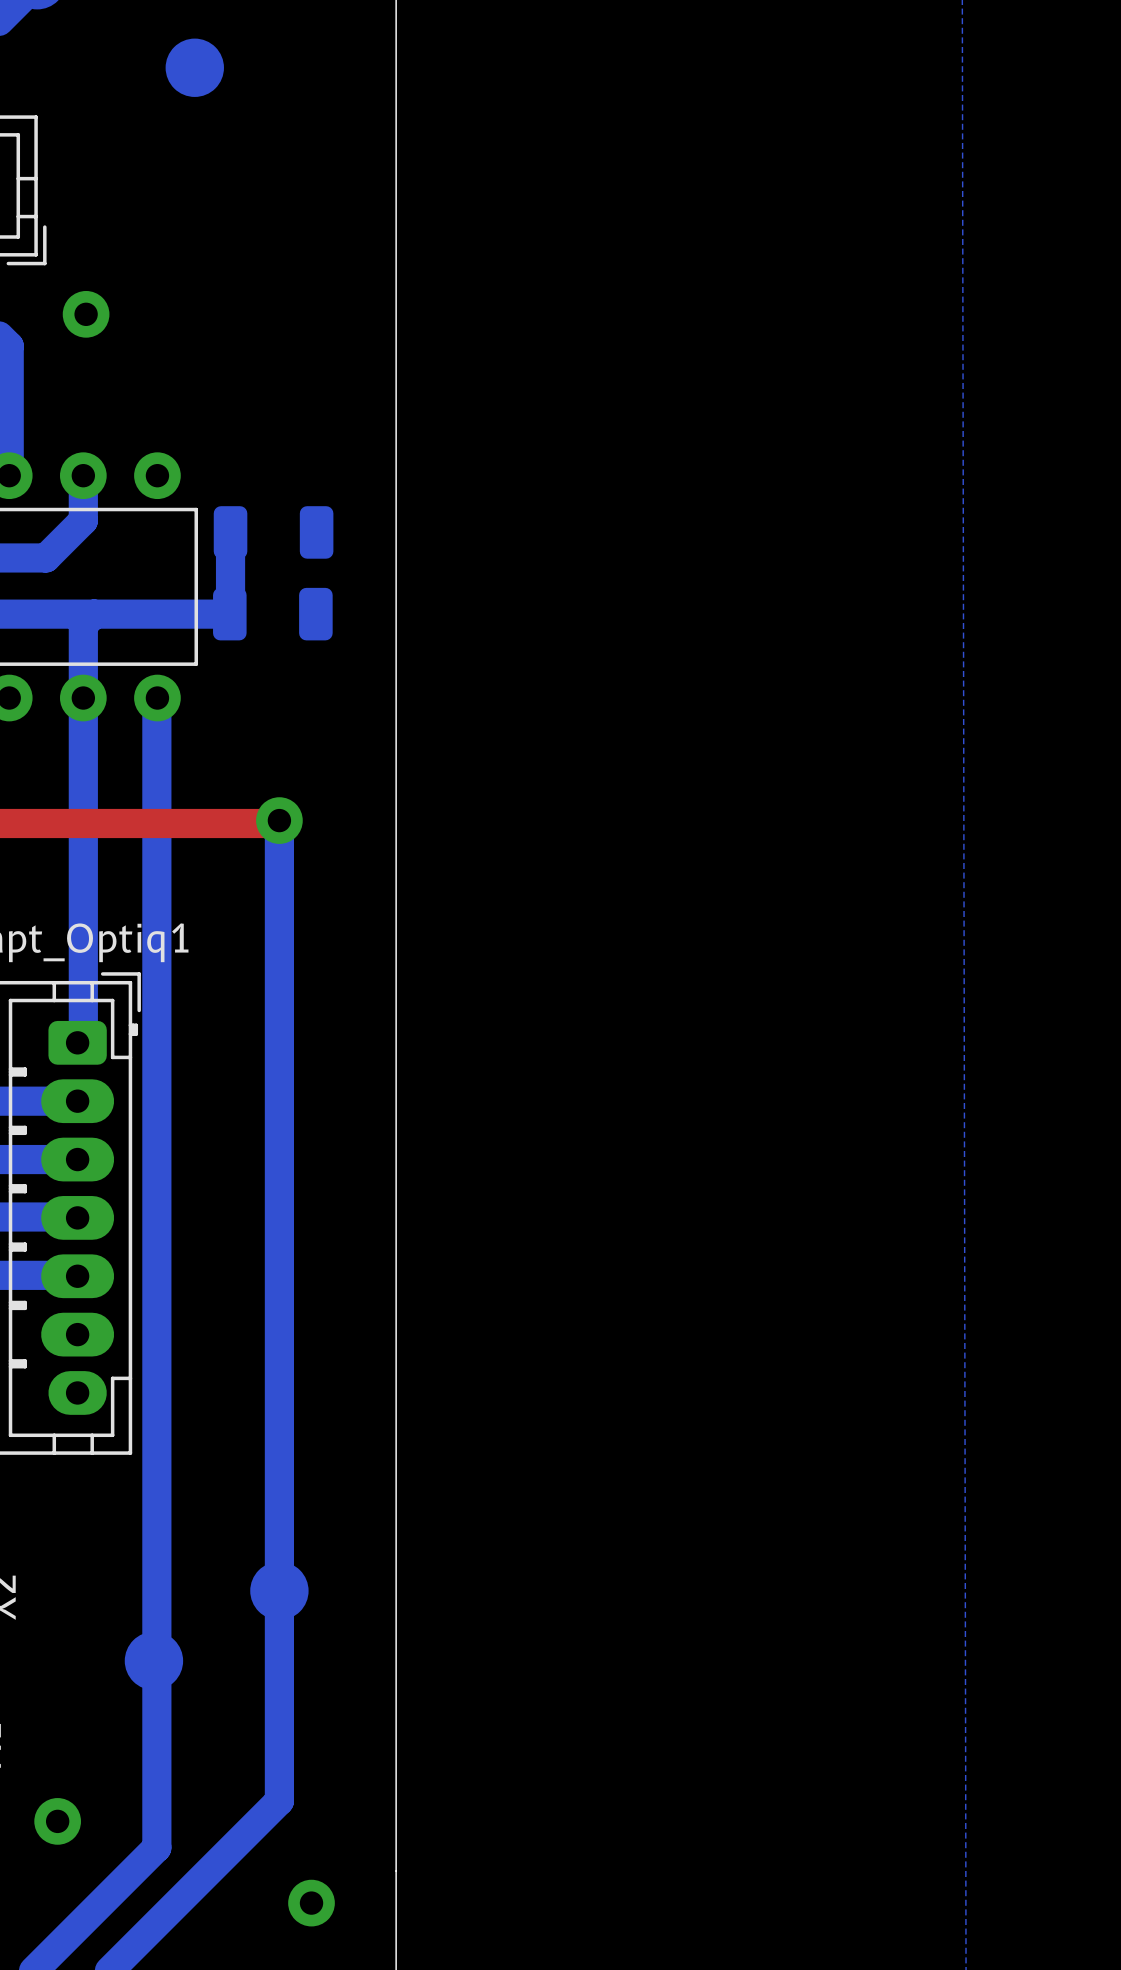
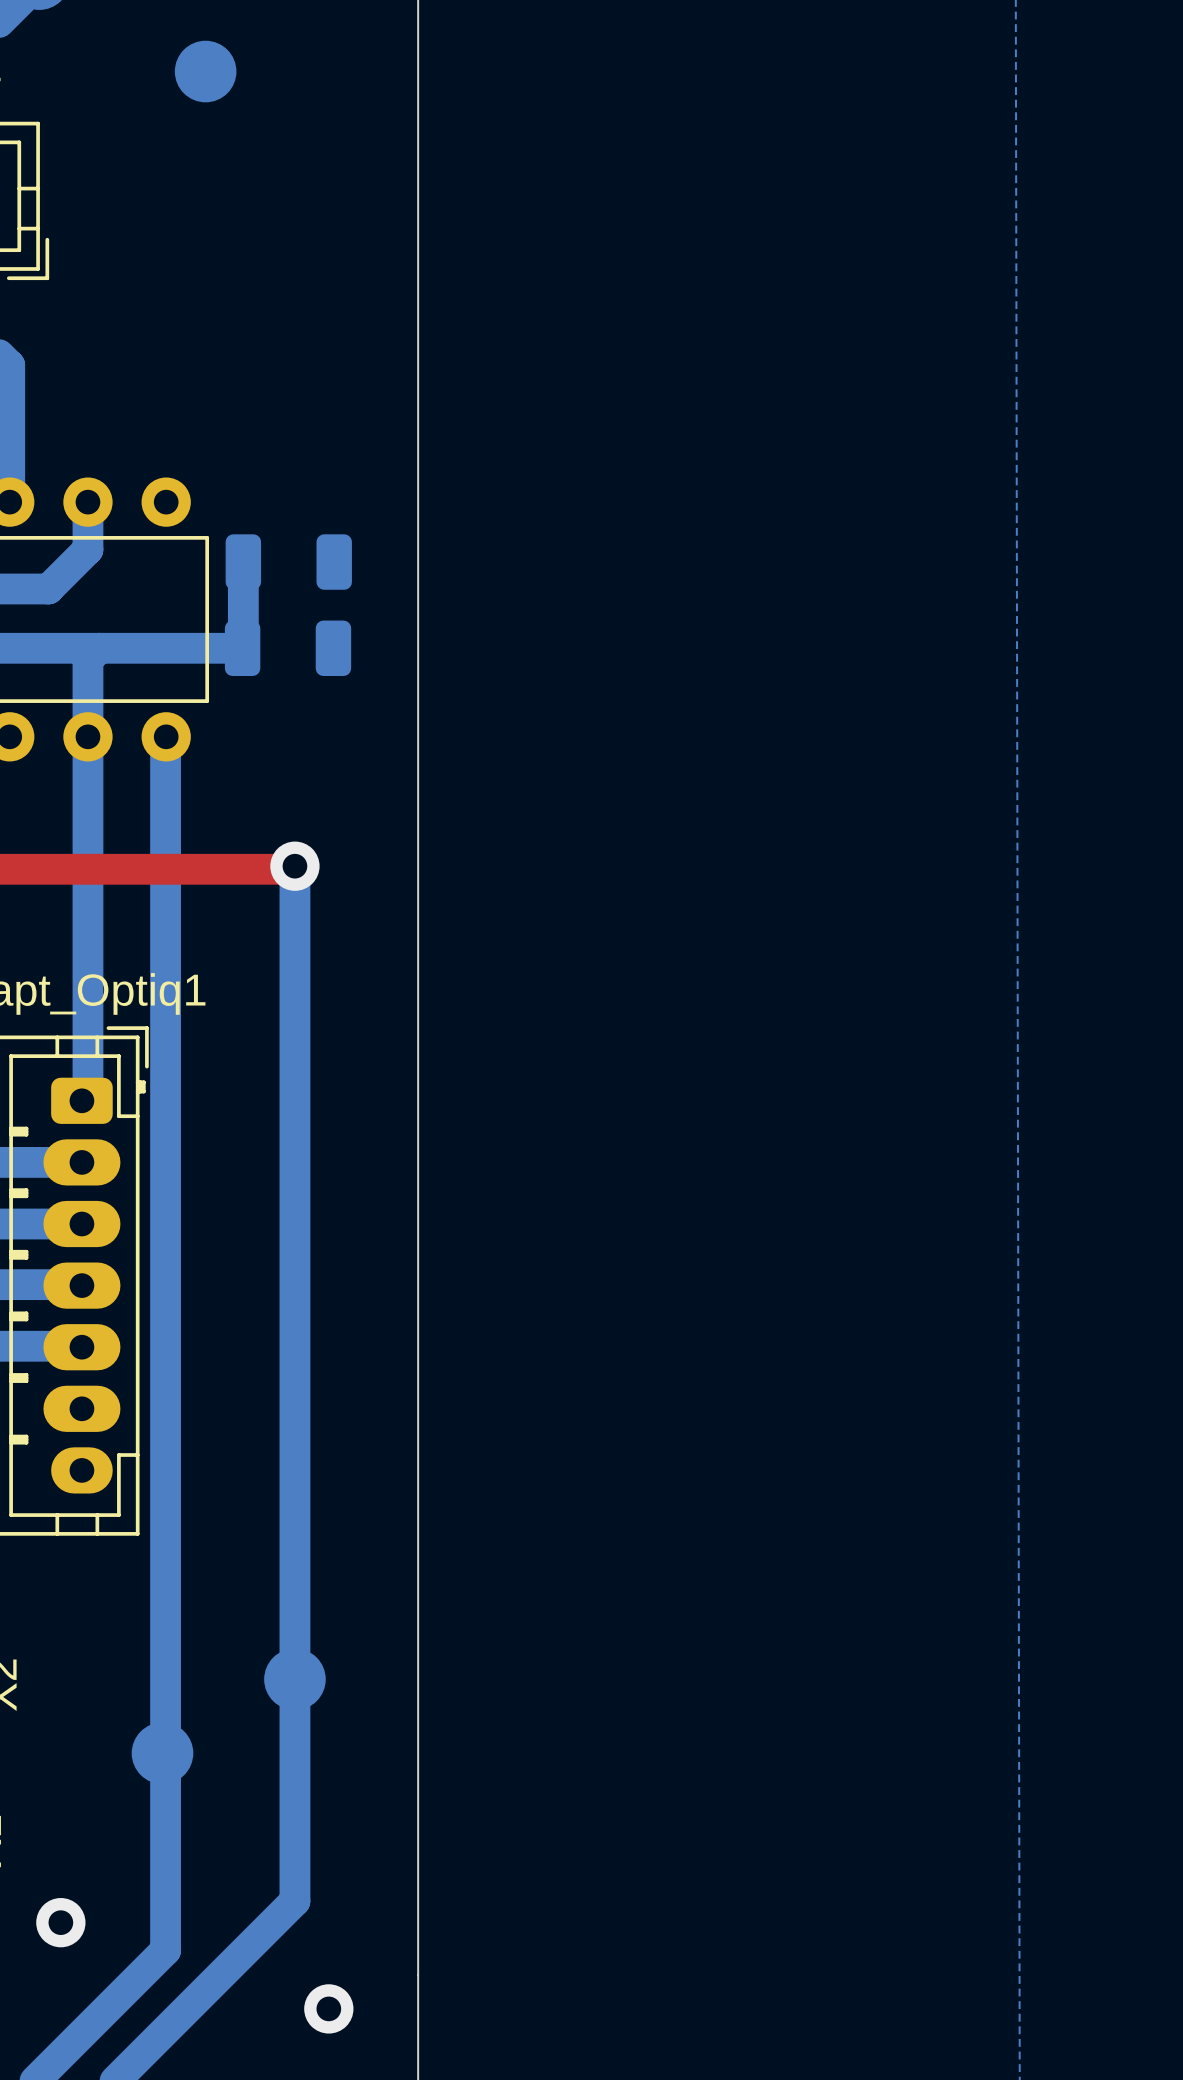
via: (86, 314) -> none

